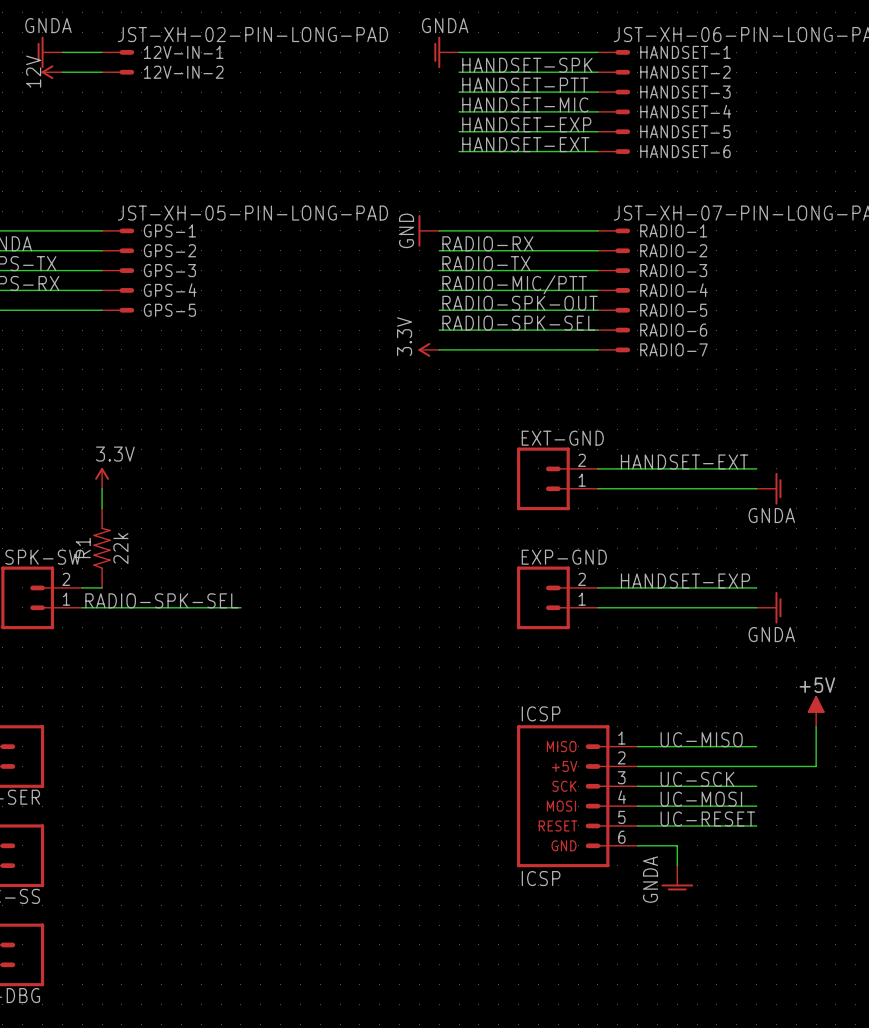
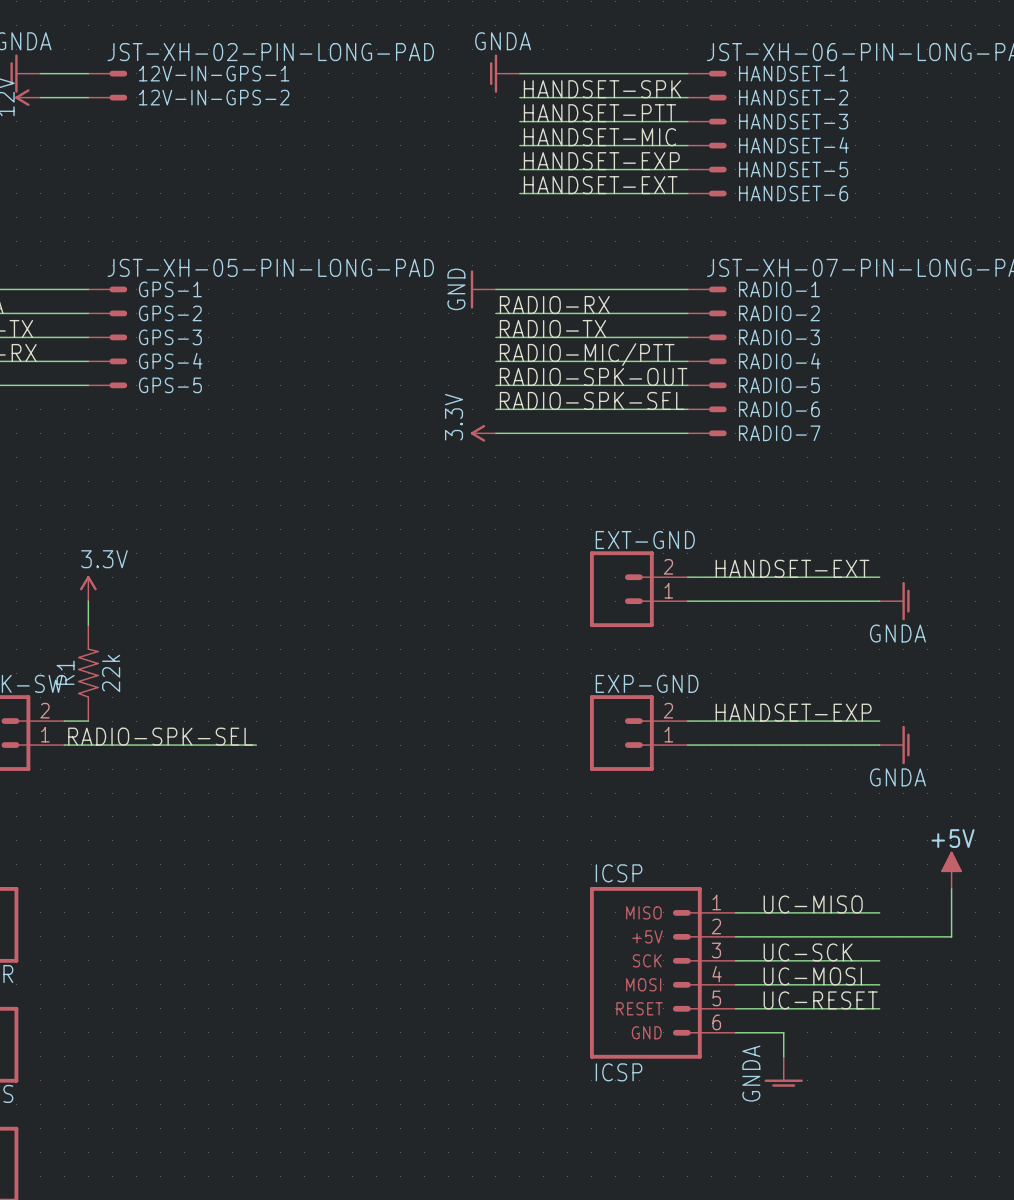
12V-IN-1 name: 12V-IN-1 (183, 52) -> 12V-IN-GPS-1 (214, 73)
12V-IN-2 name: 12V-IN-2 (183, 72) -> 12V-IN-GPS-2 (214, 97)

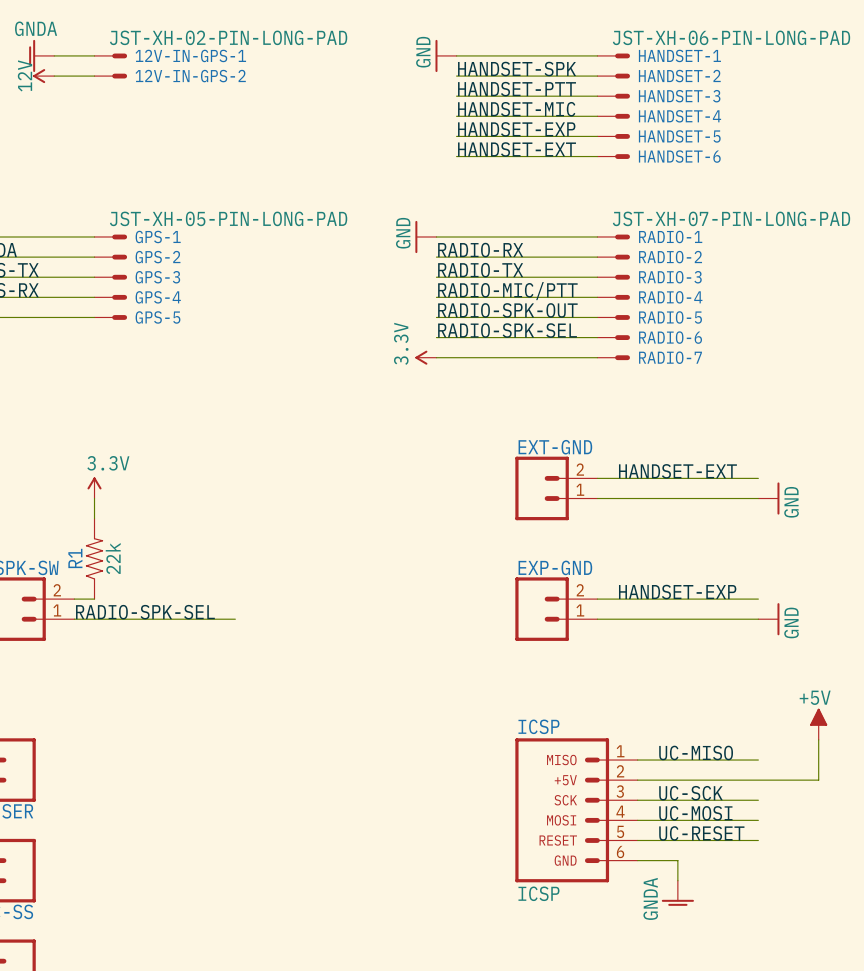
power symbol: GNDA (504, 73) -> GND (446, 55)
power symbol: GNDA (894, 601) -> GND (768, 498)
power symbol: GNDA (894, 745) -> GND (768, 619)

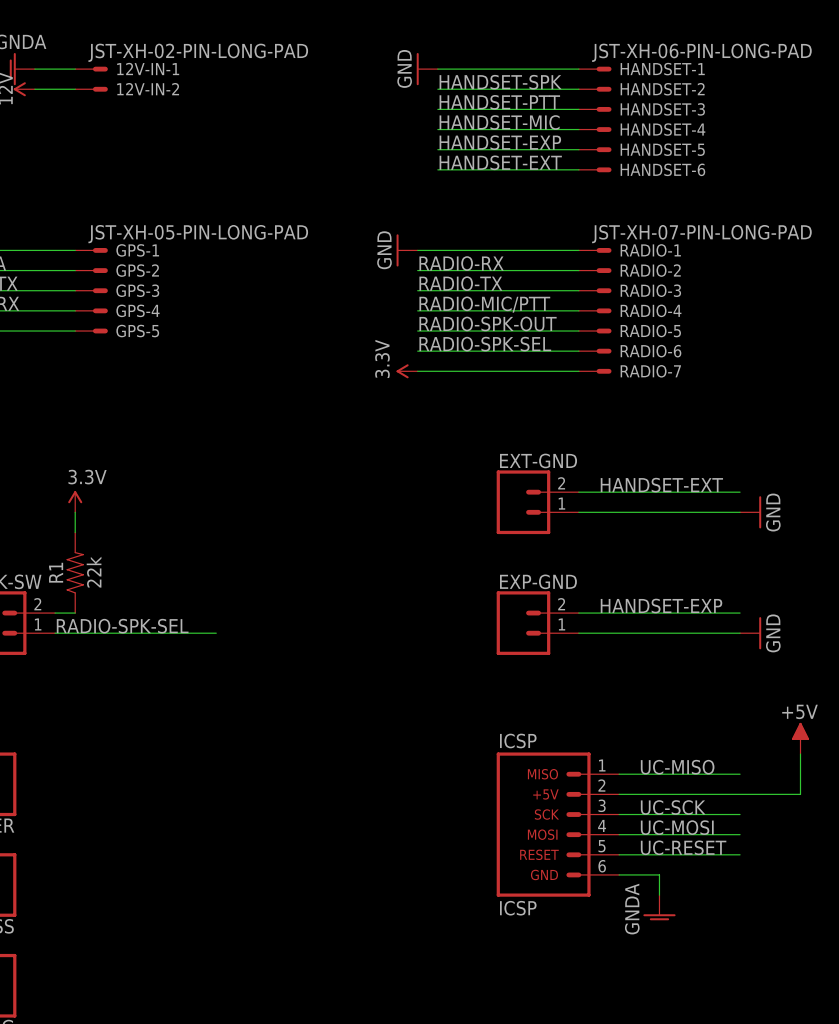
12V-IN-GPS-1 name: 12V-IN-GPS-1 (190, 55) -> 12V-IN-1 (148, 68)
12V-IN-GPS-2 name: 12V-IN-GPS-2 (190, 76) -> 12V-IN-2 (148, 89)

